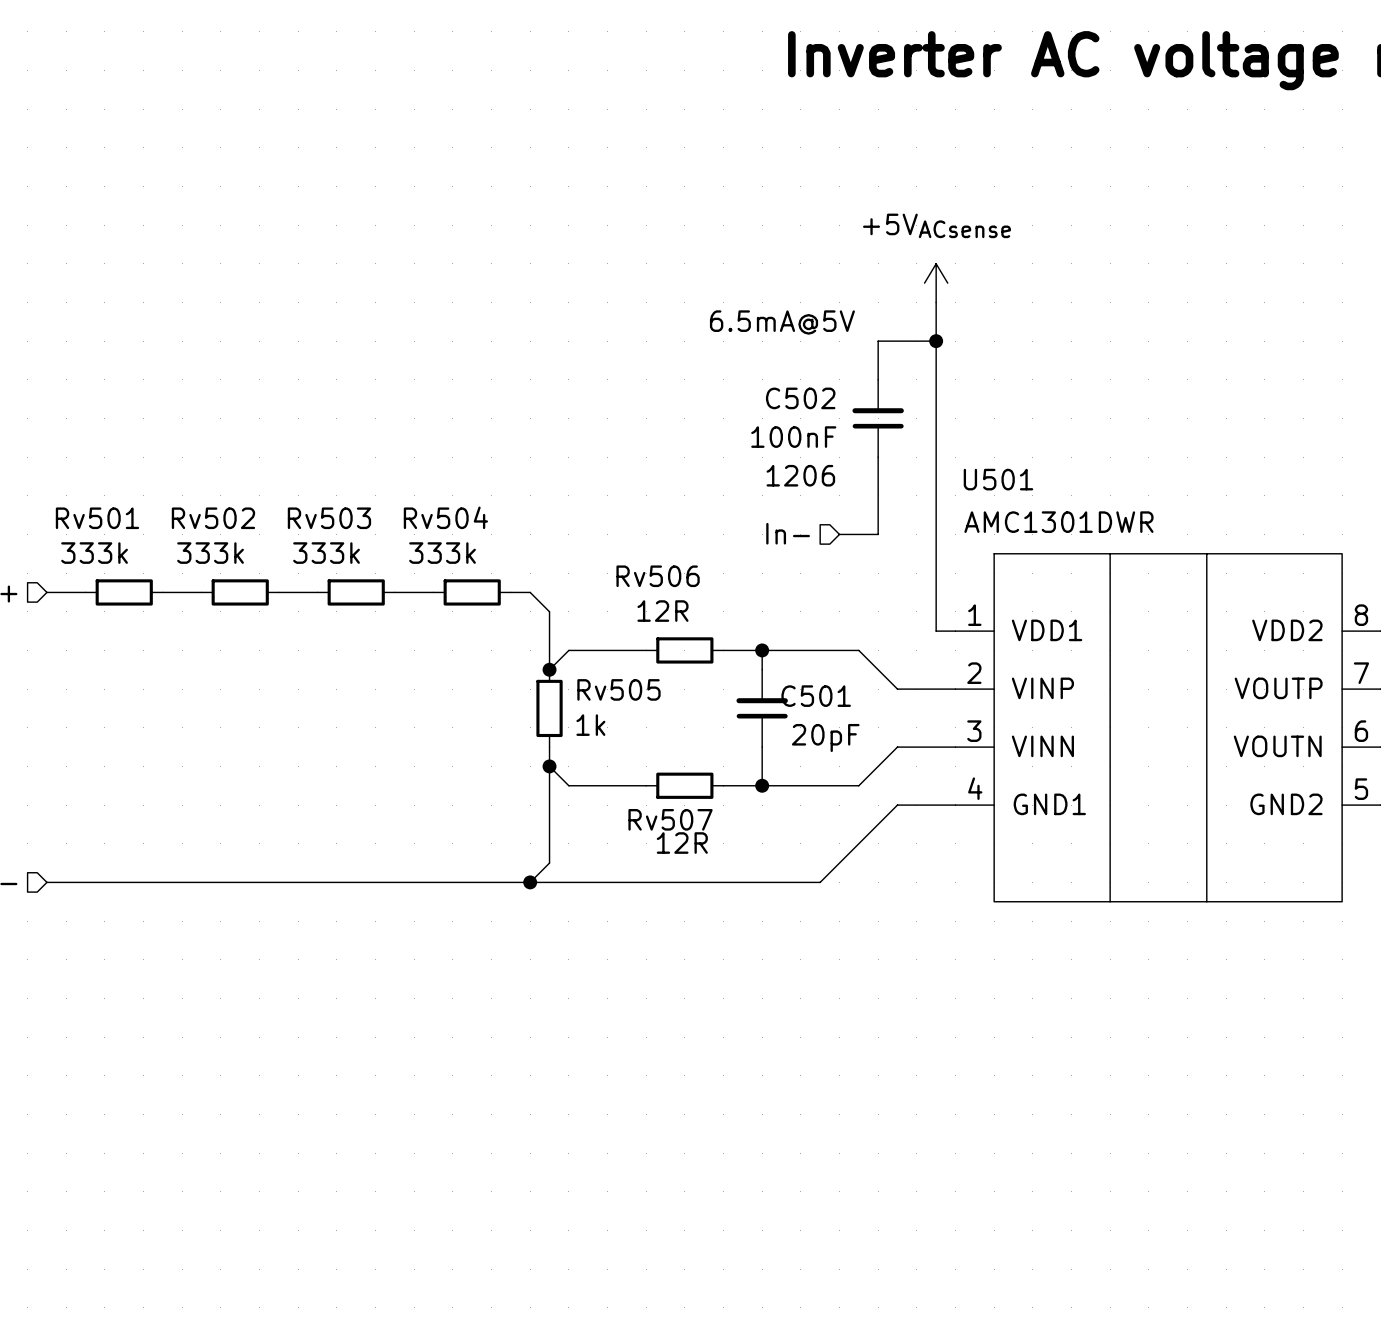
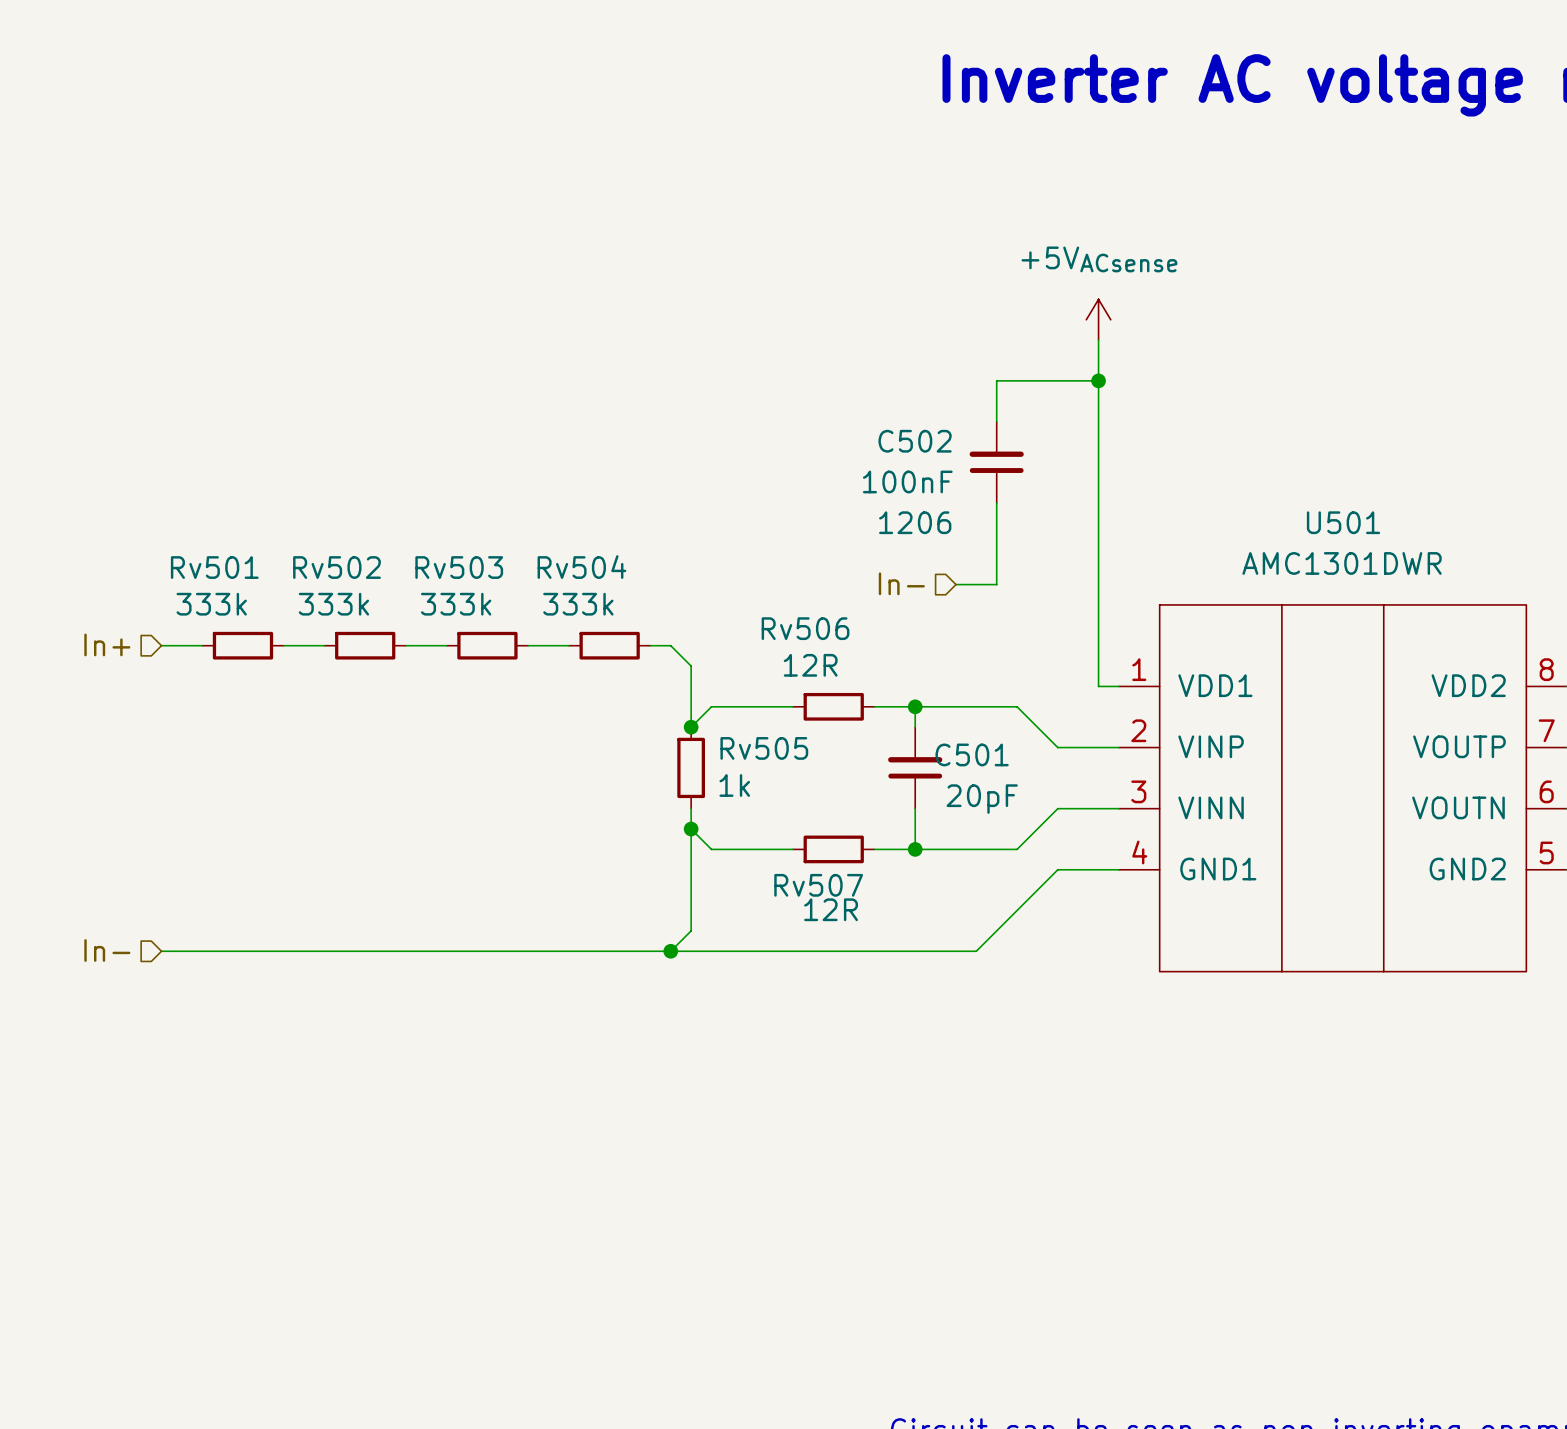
text: 6.5mA@5V (782, 322) -> none
wire: (878, 341) (878, 379) -> (1037, 380) (996, 380) (996, 421)
C502 position: (878, 418) -> (996, 462)
wire: (878, 457) (878, 534) (839, 534) -> (996, 503) (996, 584) (955, 584)
U501 name position: U501 (998, 479) -> U501 (1343, 522)
U501 value position: AMC1301DWR (1058, 522) -> AMC1301DWR (1342, 563)
hierarchical label position: In- (788, 533) -> In- (901, 583)

